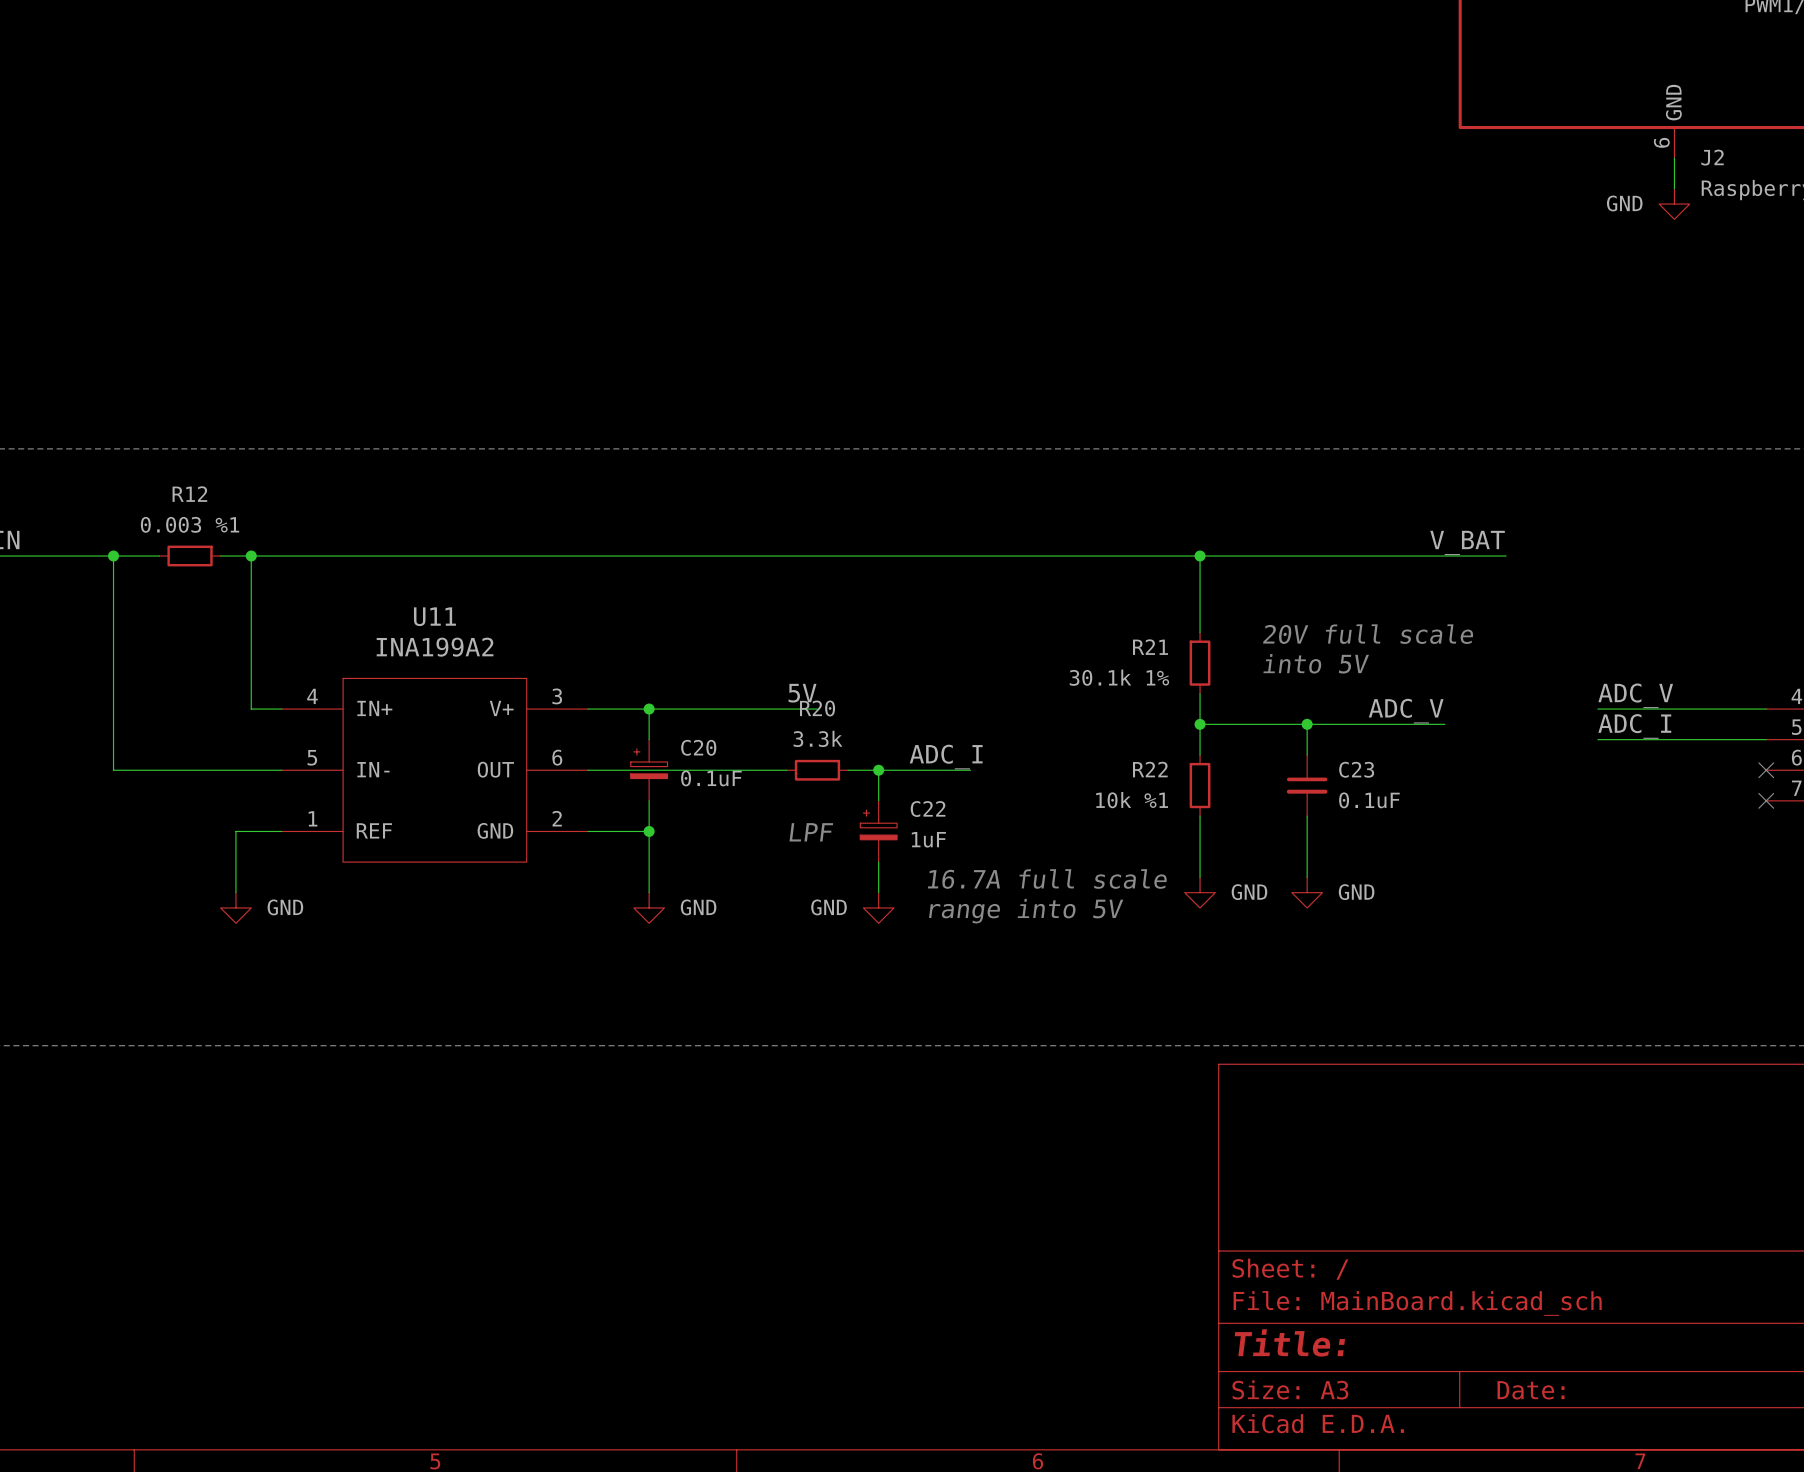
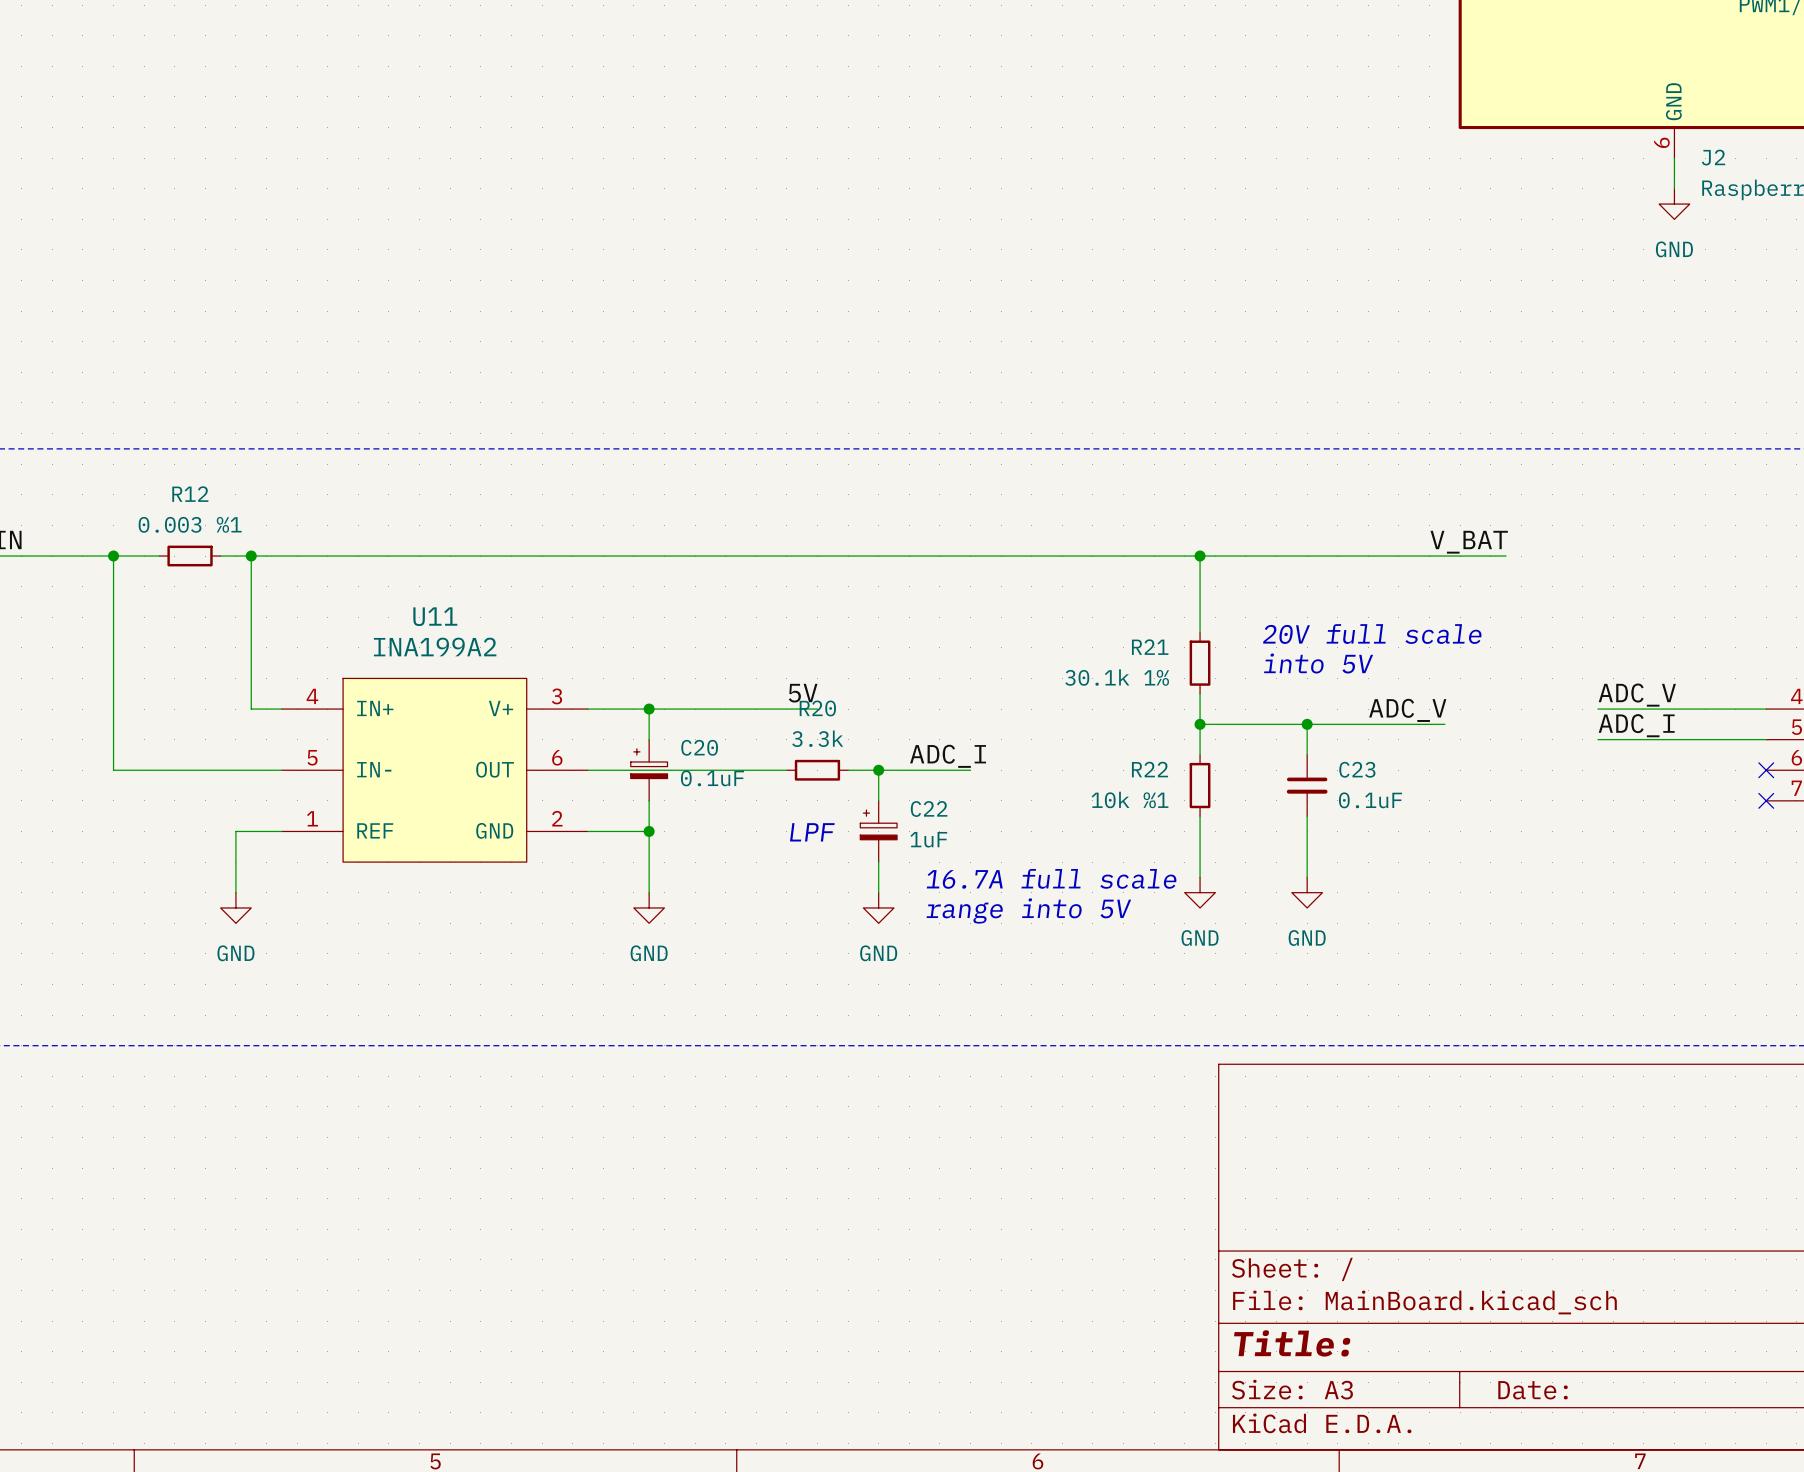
power symbol text position: GND (1624, 203) -> GND (1674, 249)
power symbol text position: GND (1249, 892) -> GND (1200, 938)
power symbol text position: GND (1356, 892) -> GND (1307, 938)
power symbol text position: GND (285, 907) -> GND (235, 953)
power symbol text position: GND (698, 907) -> GND (649, 953)
power symbol text position: GND (828, 907) -> GND (878, 953)

